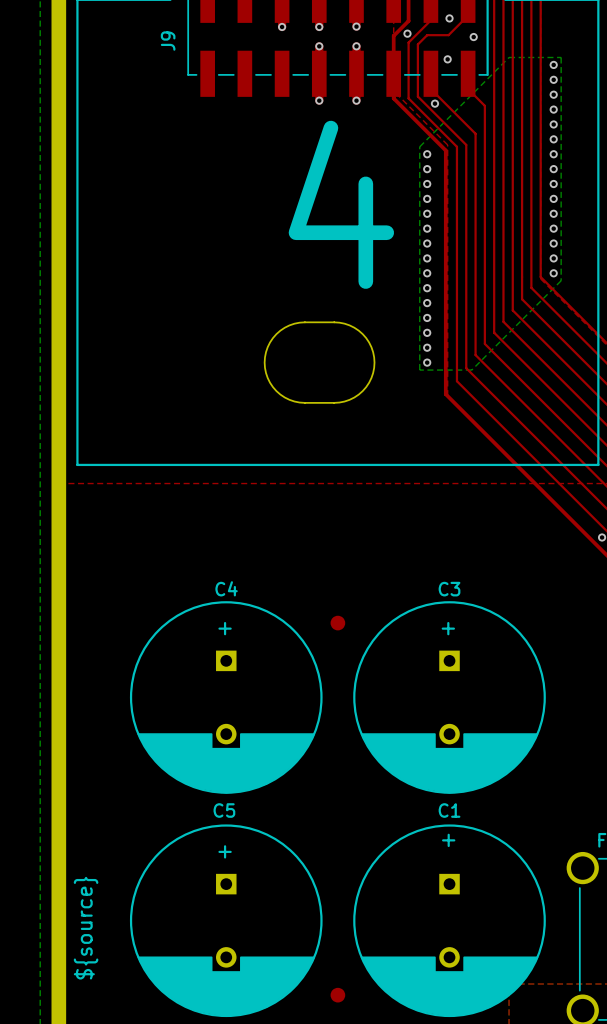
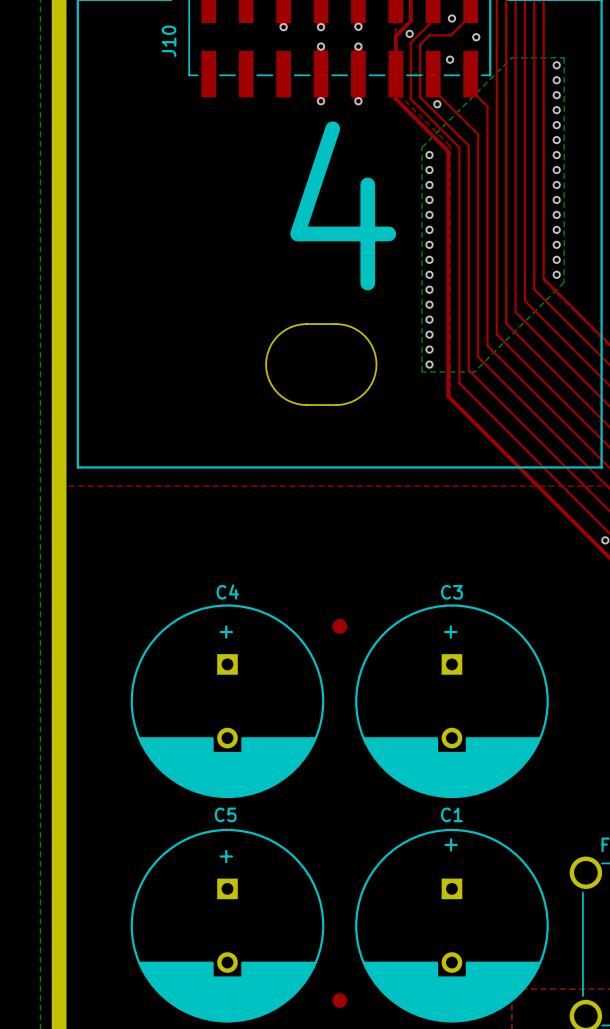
J9 name: J9 (168, 41) -> J10 (169, 41)
text: ${source} (86, 928) -> none

